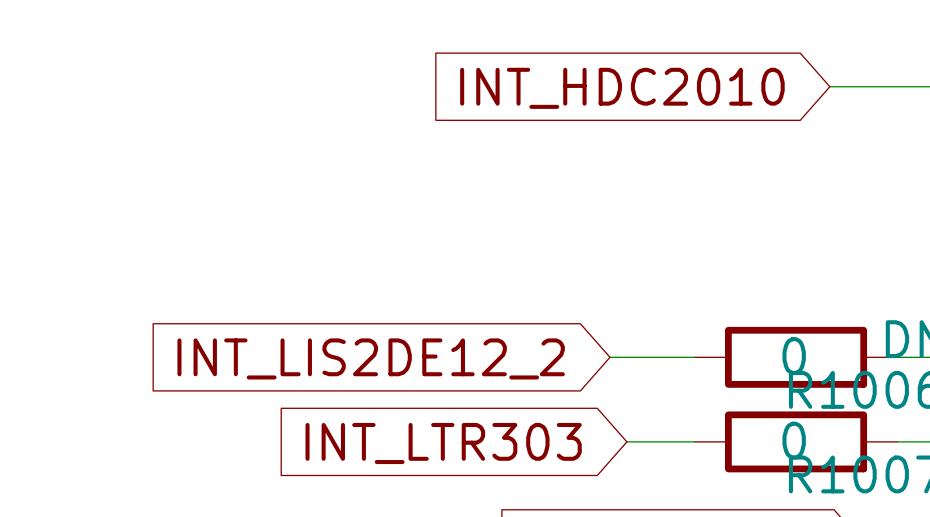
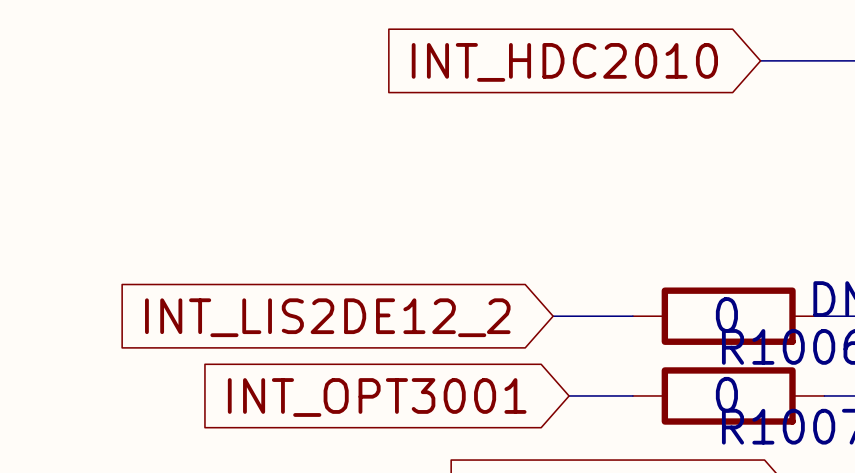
global label: INT_LTR303 (443, 443) -> INT_OPT3001 (377, 397)

